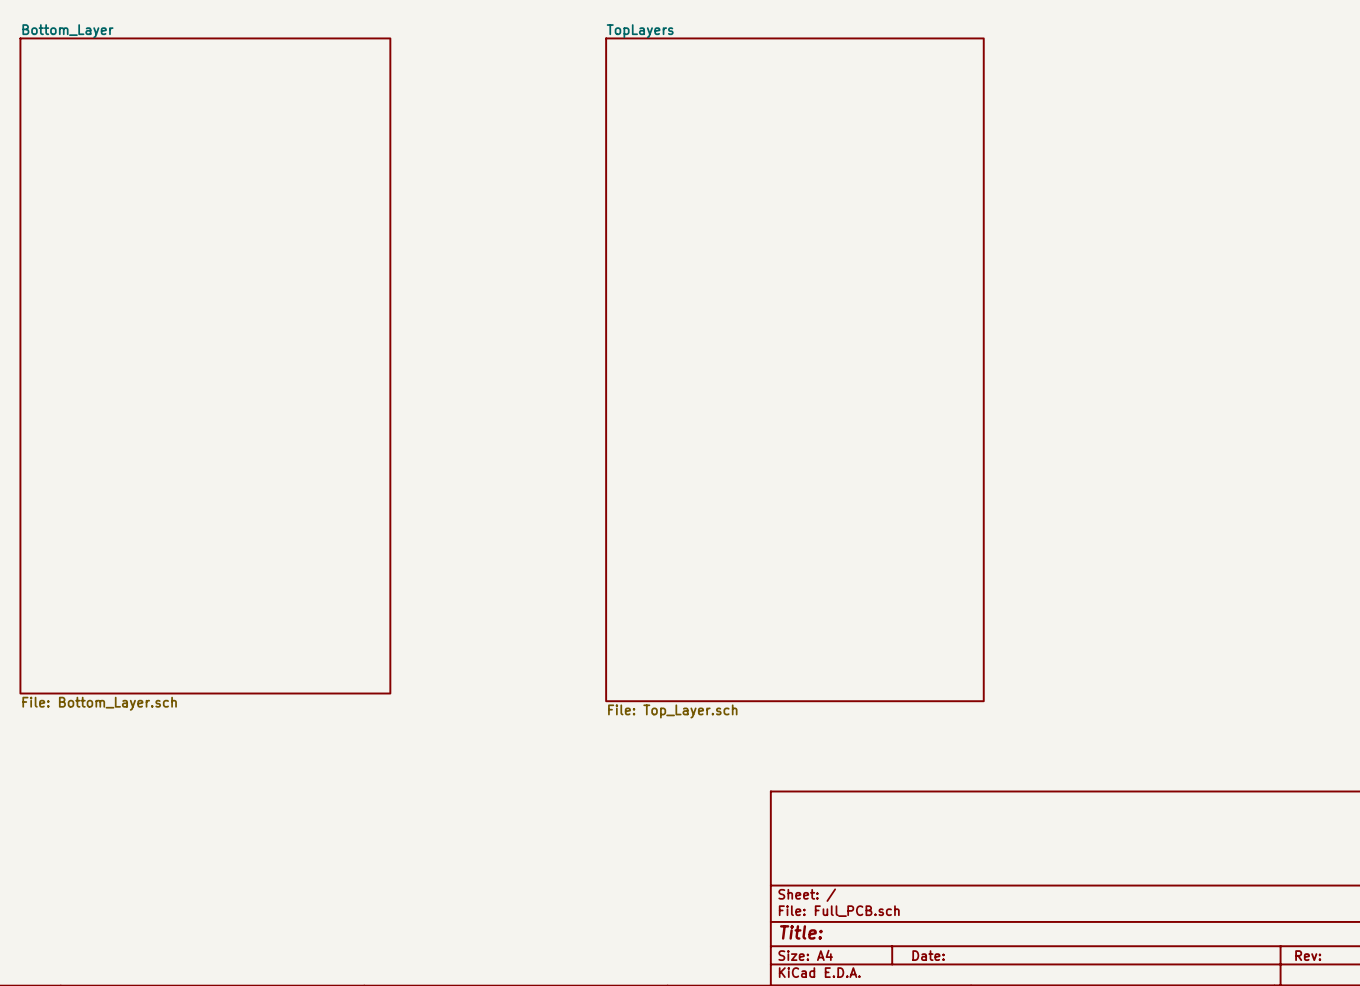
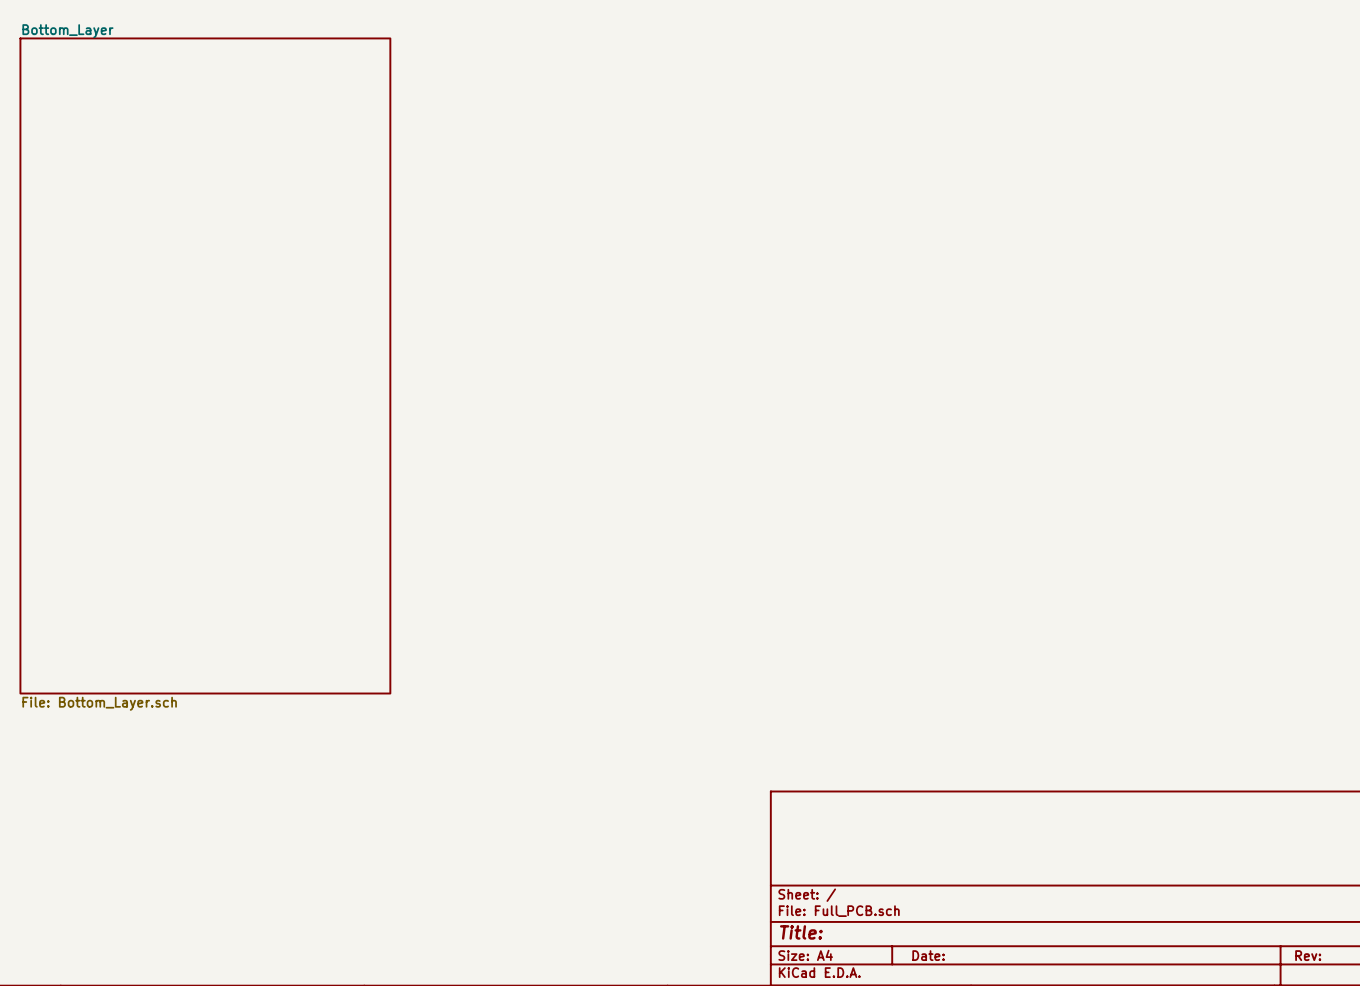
sheet TopLayers: File: Top_Layer.sch (794, 369) -> none

